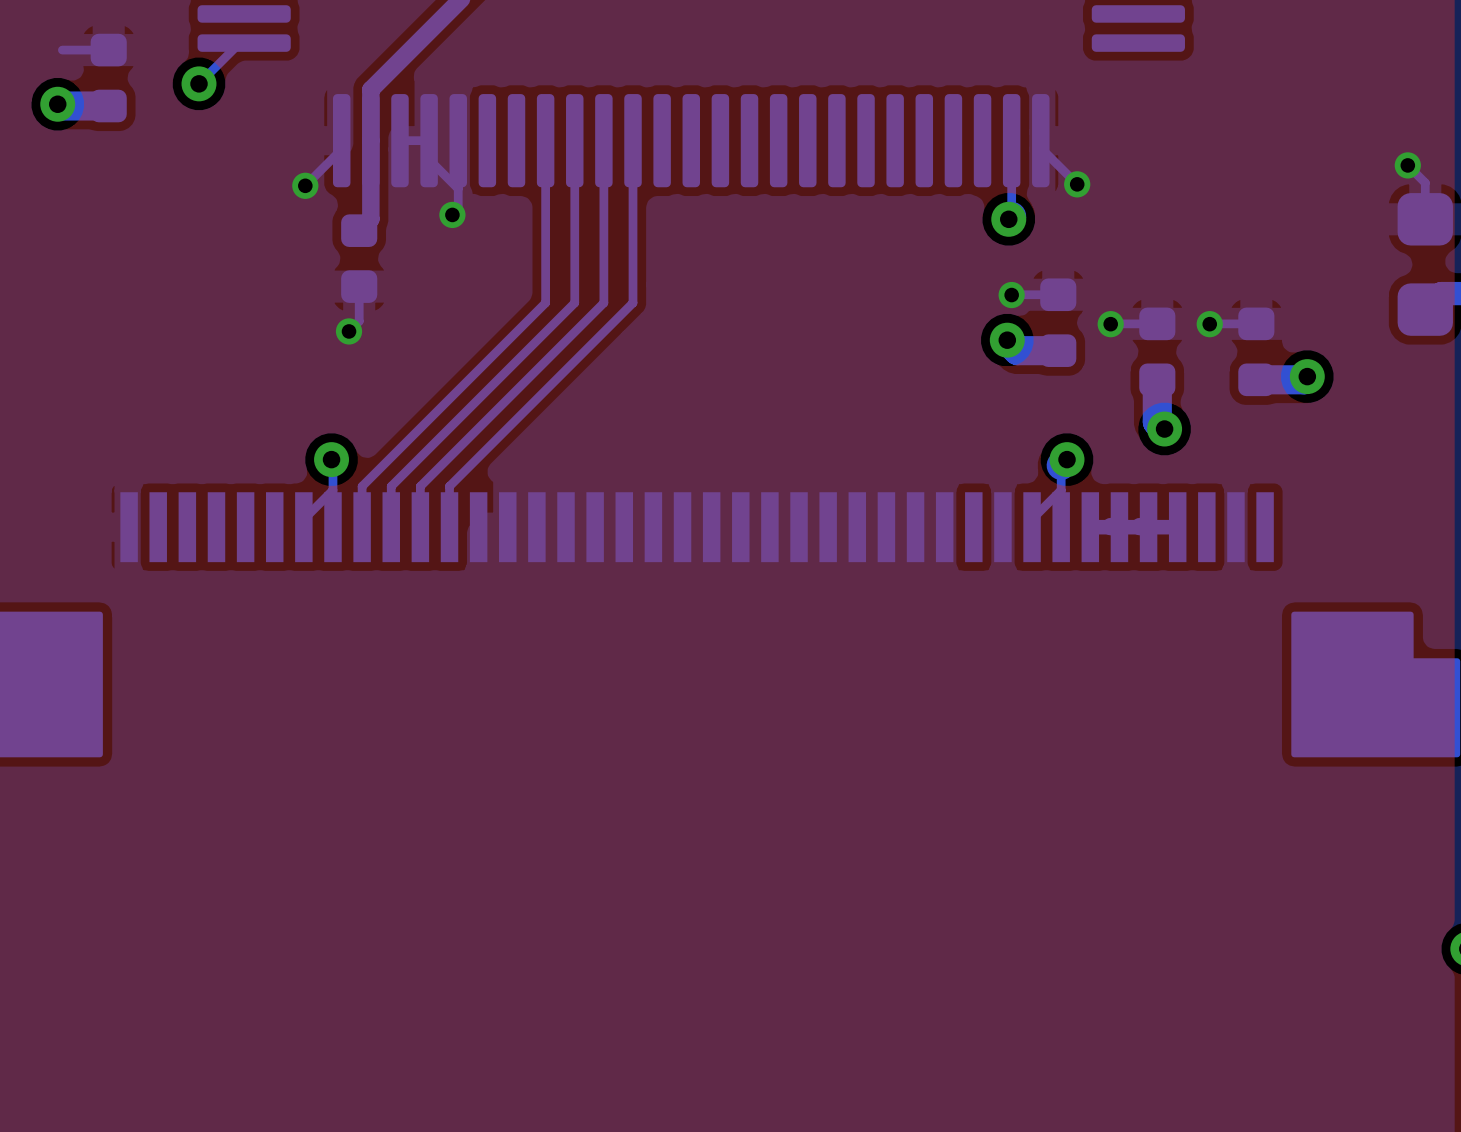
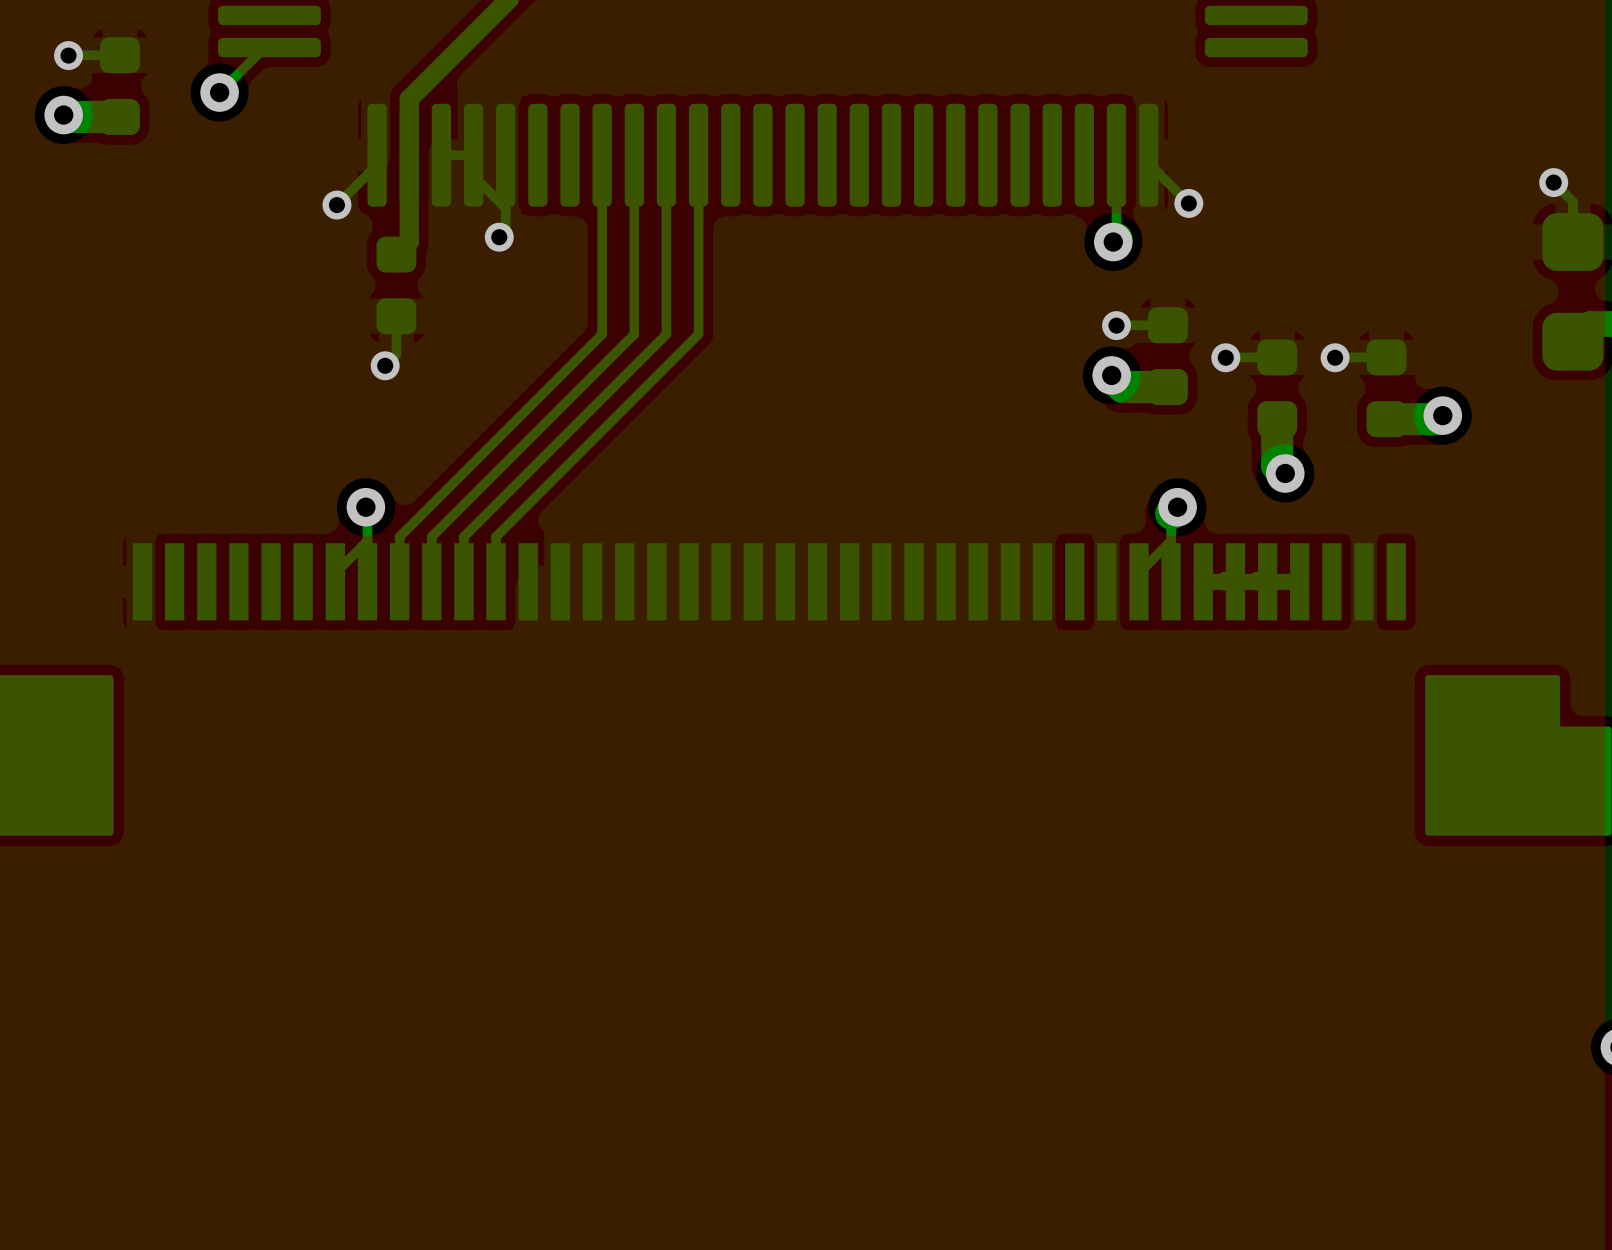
via: none -> (68, 55)

